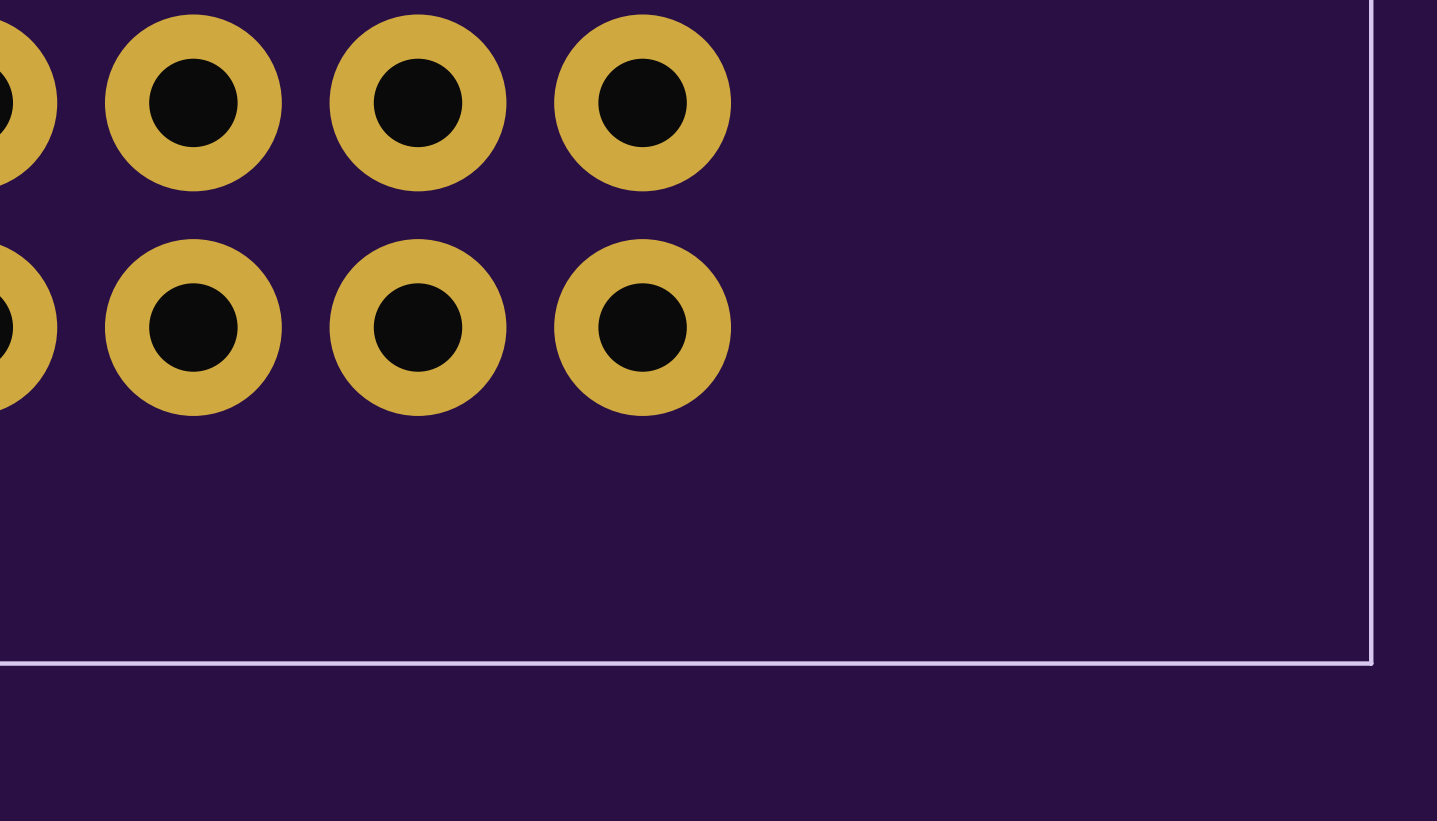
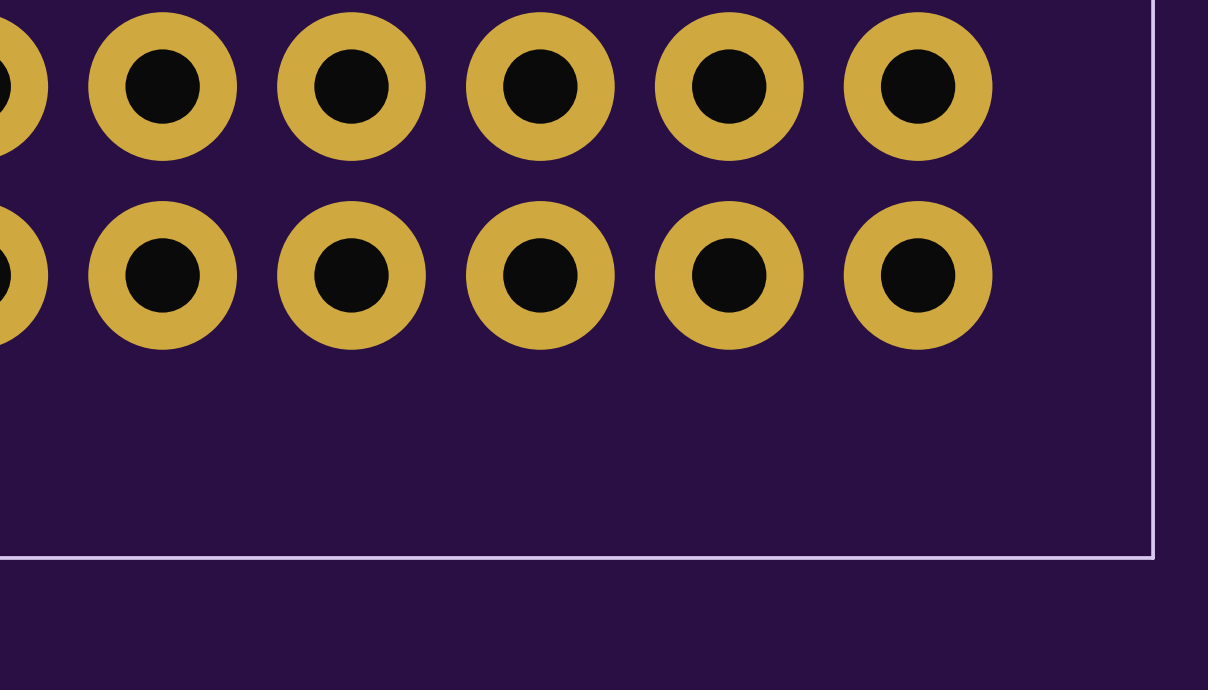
via: none -> (729, 86)
via: none -> (918, 86)
via: none -> (729, 275)
via: none -> (918, 275)

